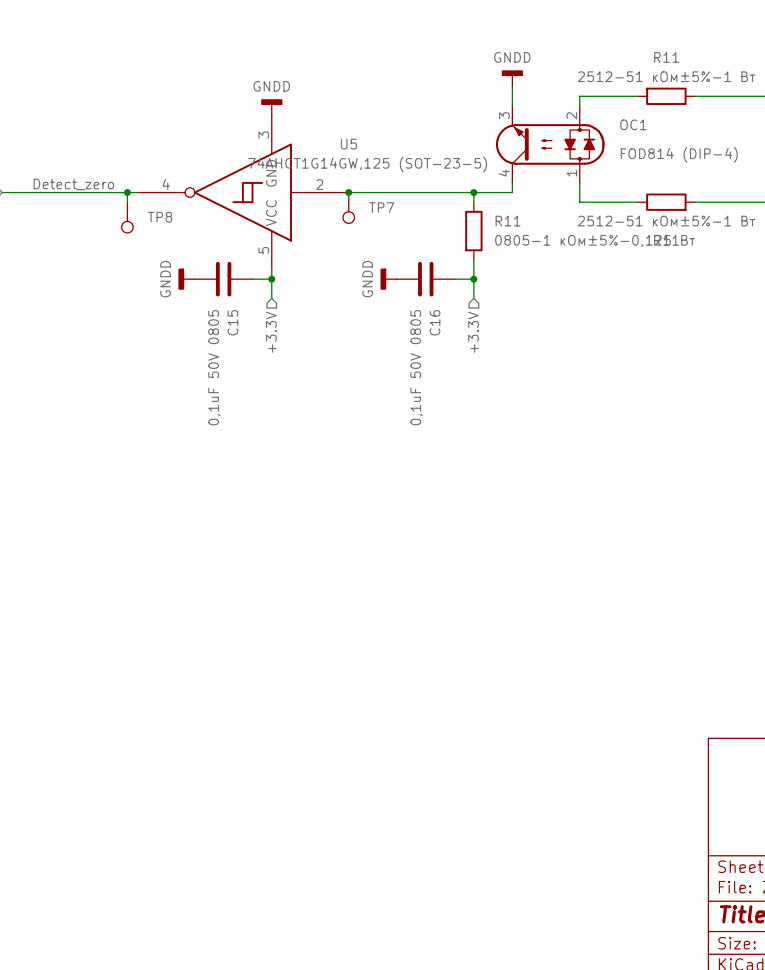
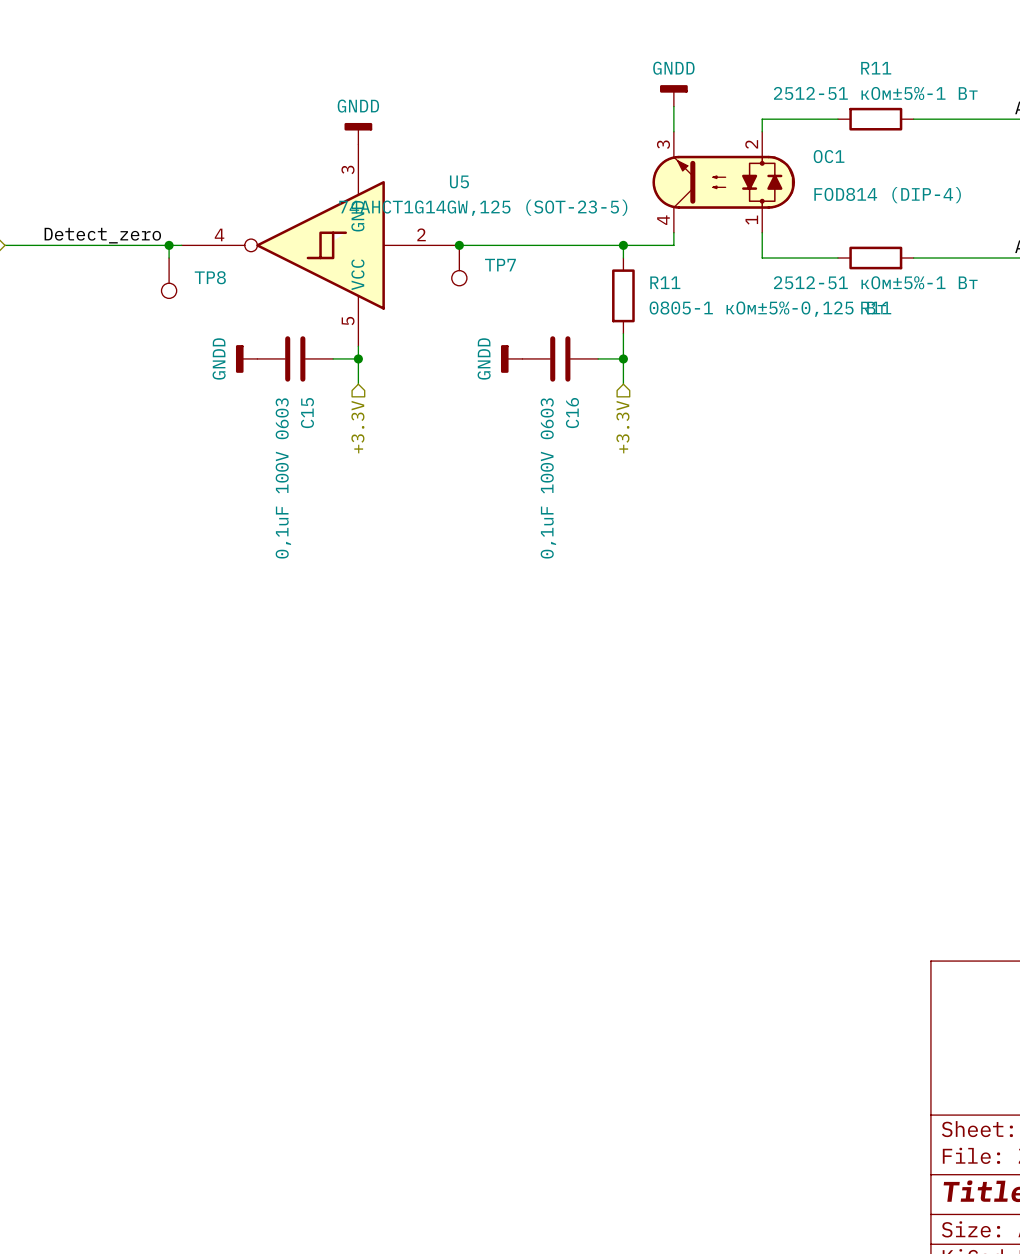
C15 value: 0,1uF 50V 0805 (214, 367) -> 0,1uF 100V 0603 (283, 478)
C16 value: 0,1uF 50V 0805 (416, 367) -> 0,1uF 100V 0603 (548, 478)

